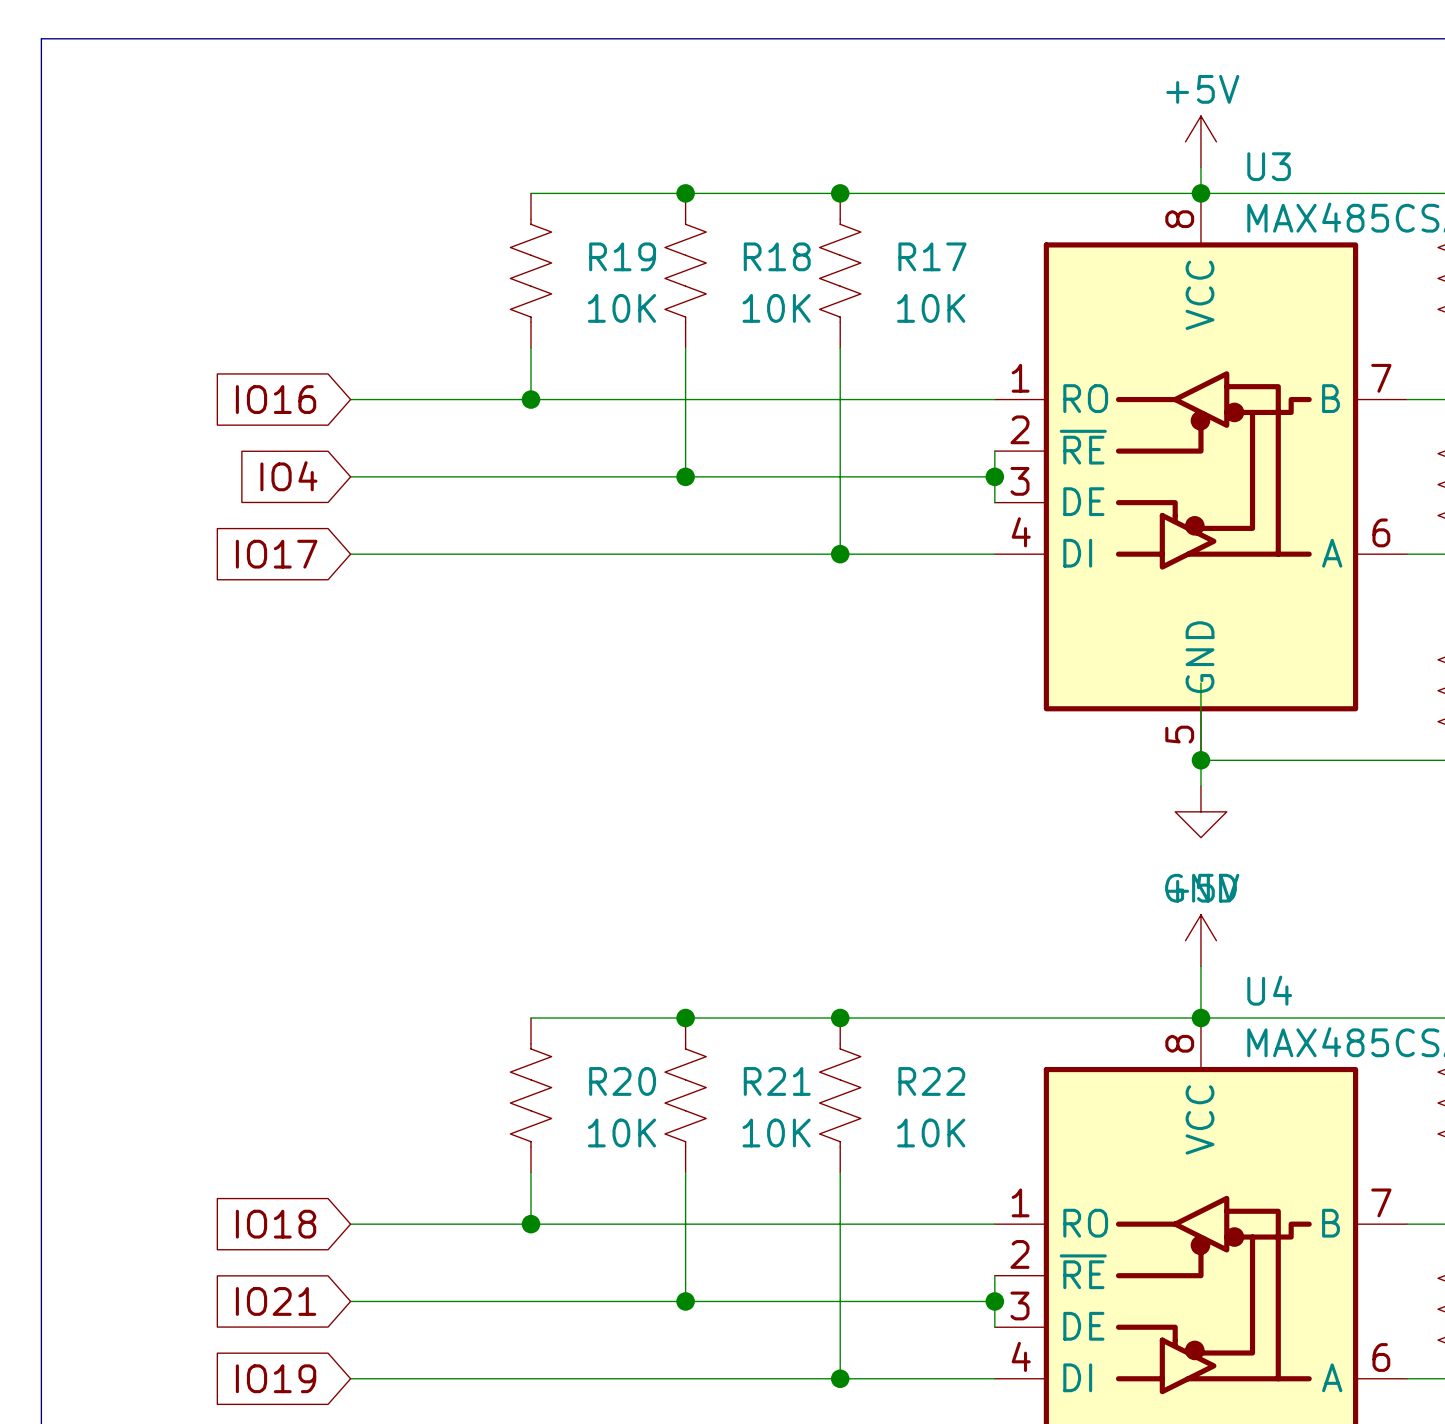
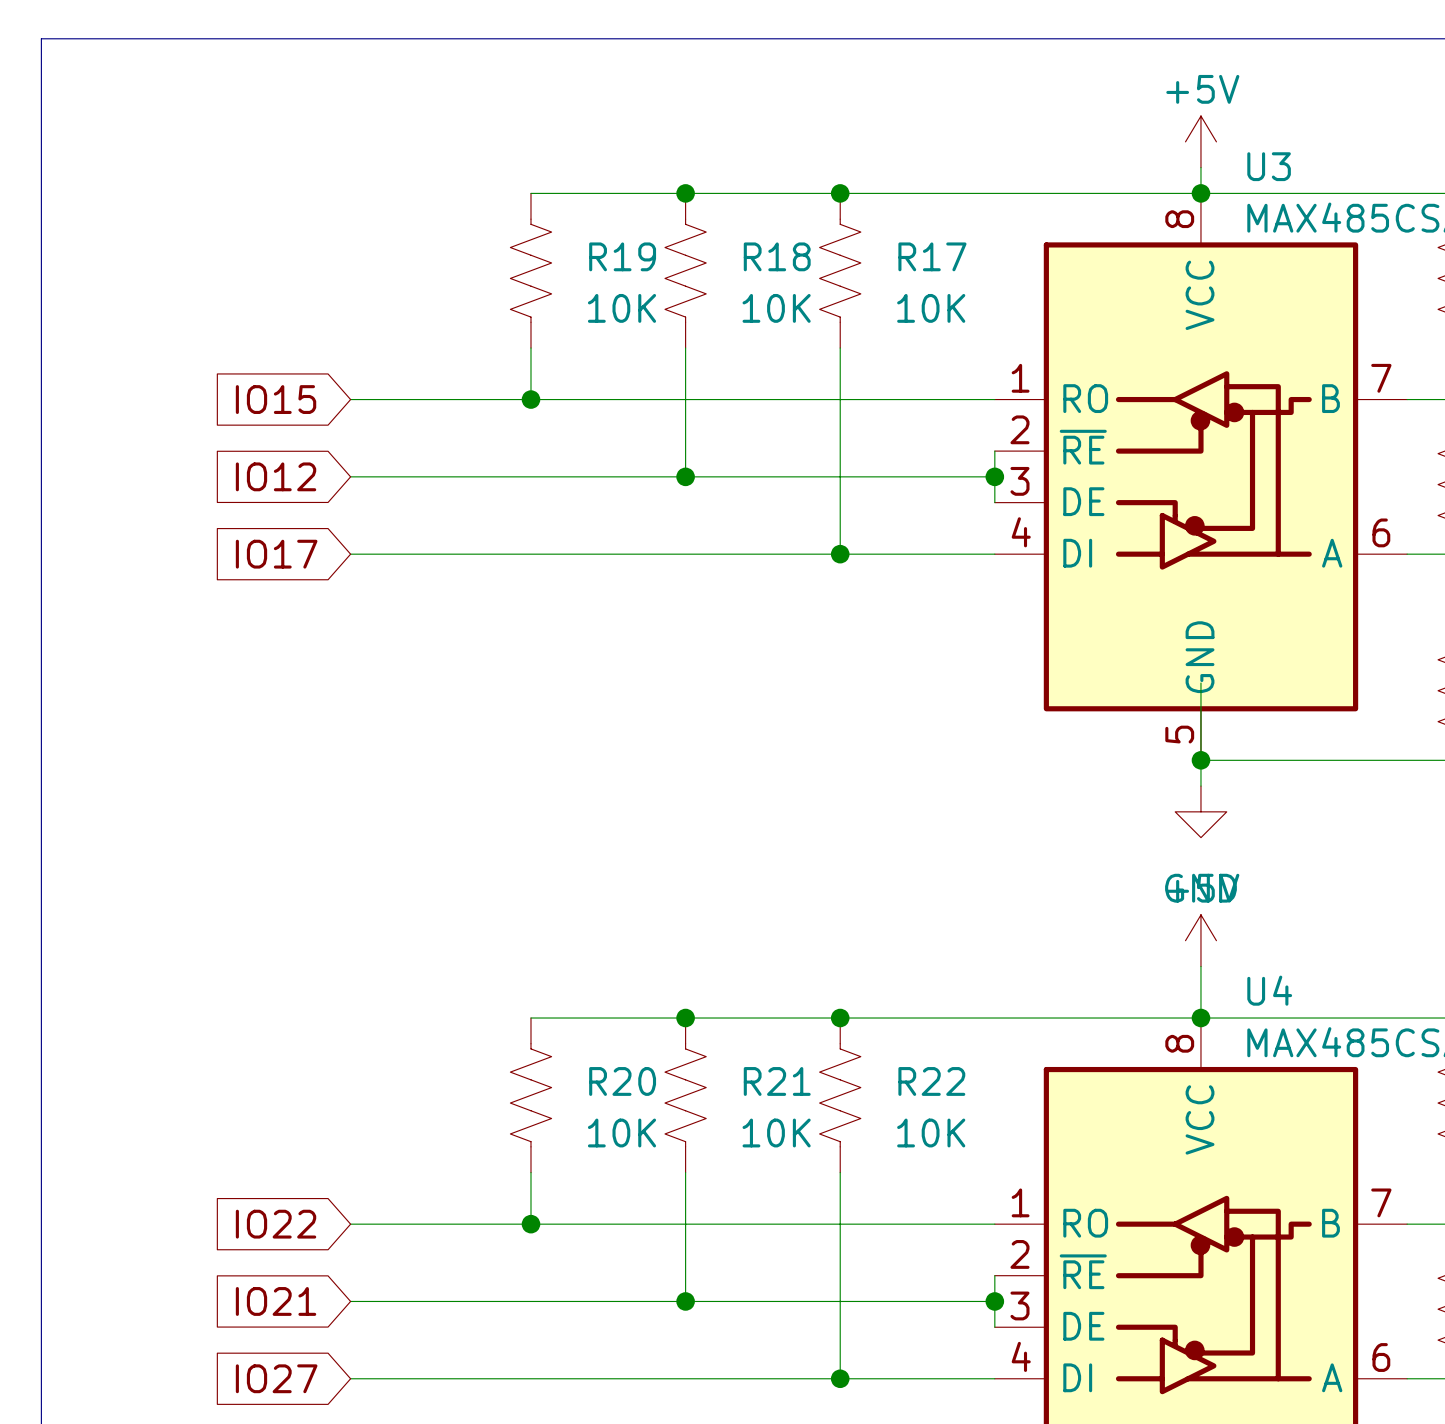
global label: IO16 (276, 399) -> IO15 (276, 399)
global label: IO4 (288, 476) -> IO12 (276, 476)
global label: IO18 (276, 1224) -> IO22 (276, 1224)
global label: IO19 (276, 1378) -> IO27 (276, 1378)

